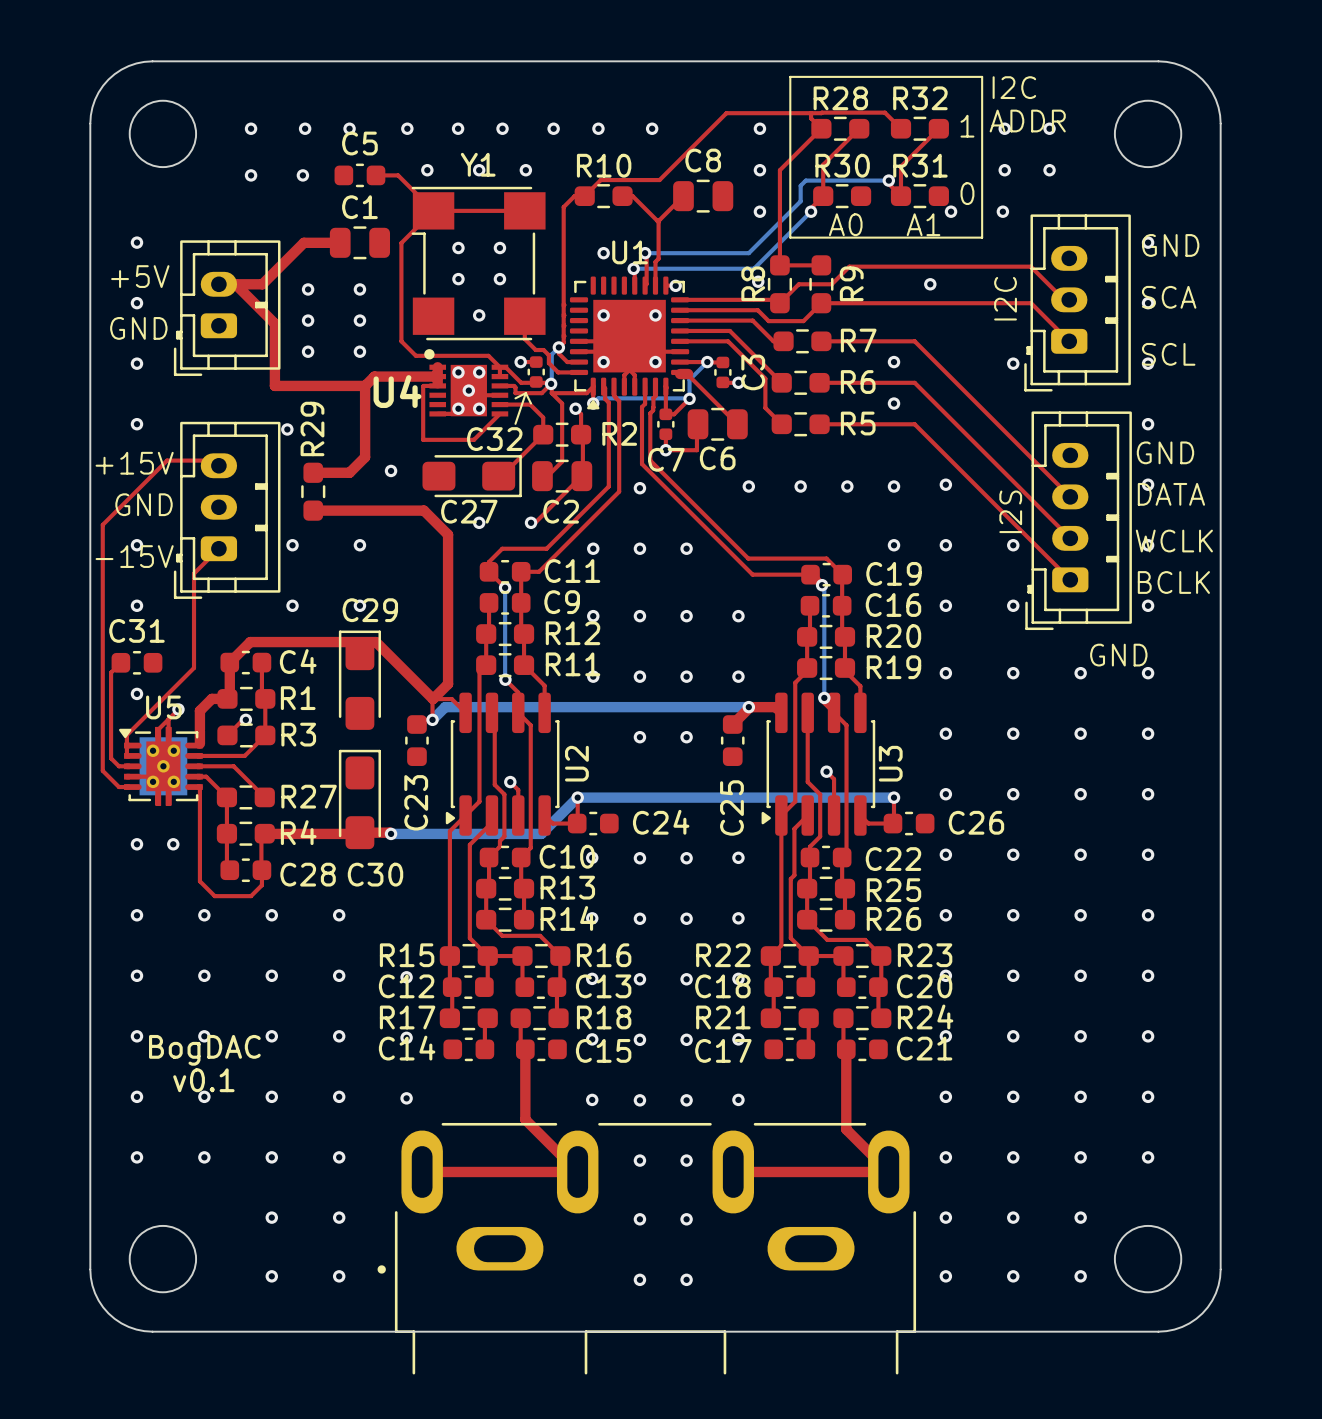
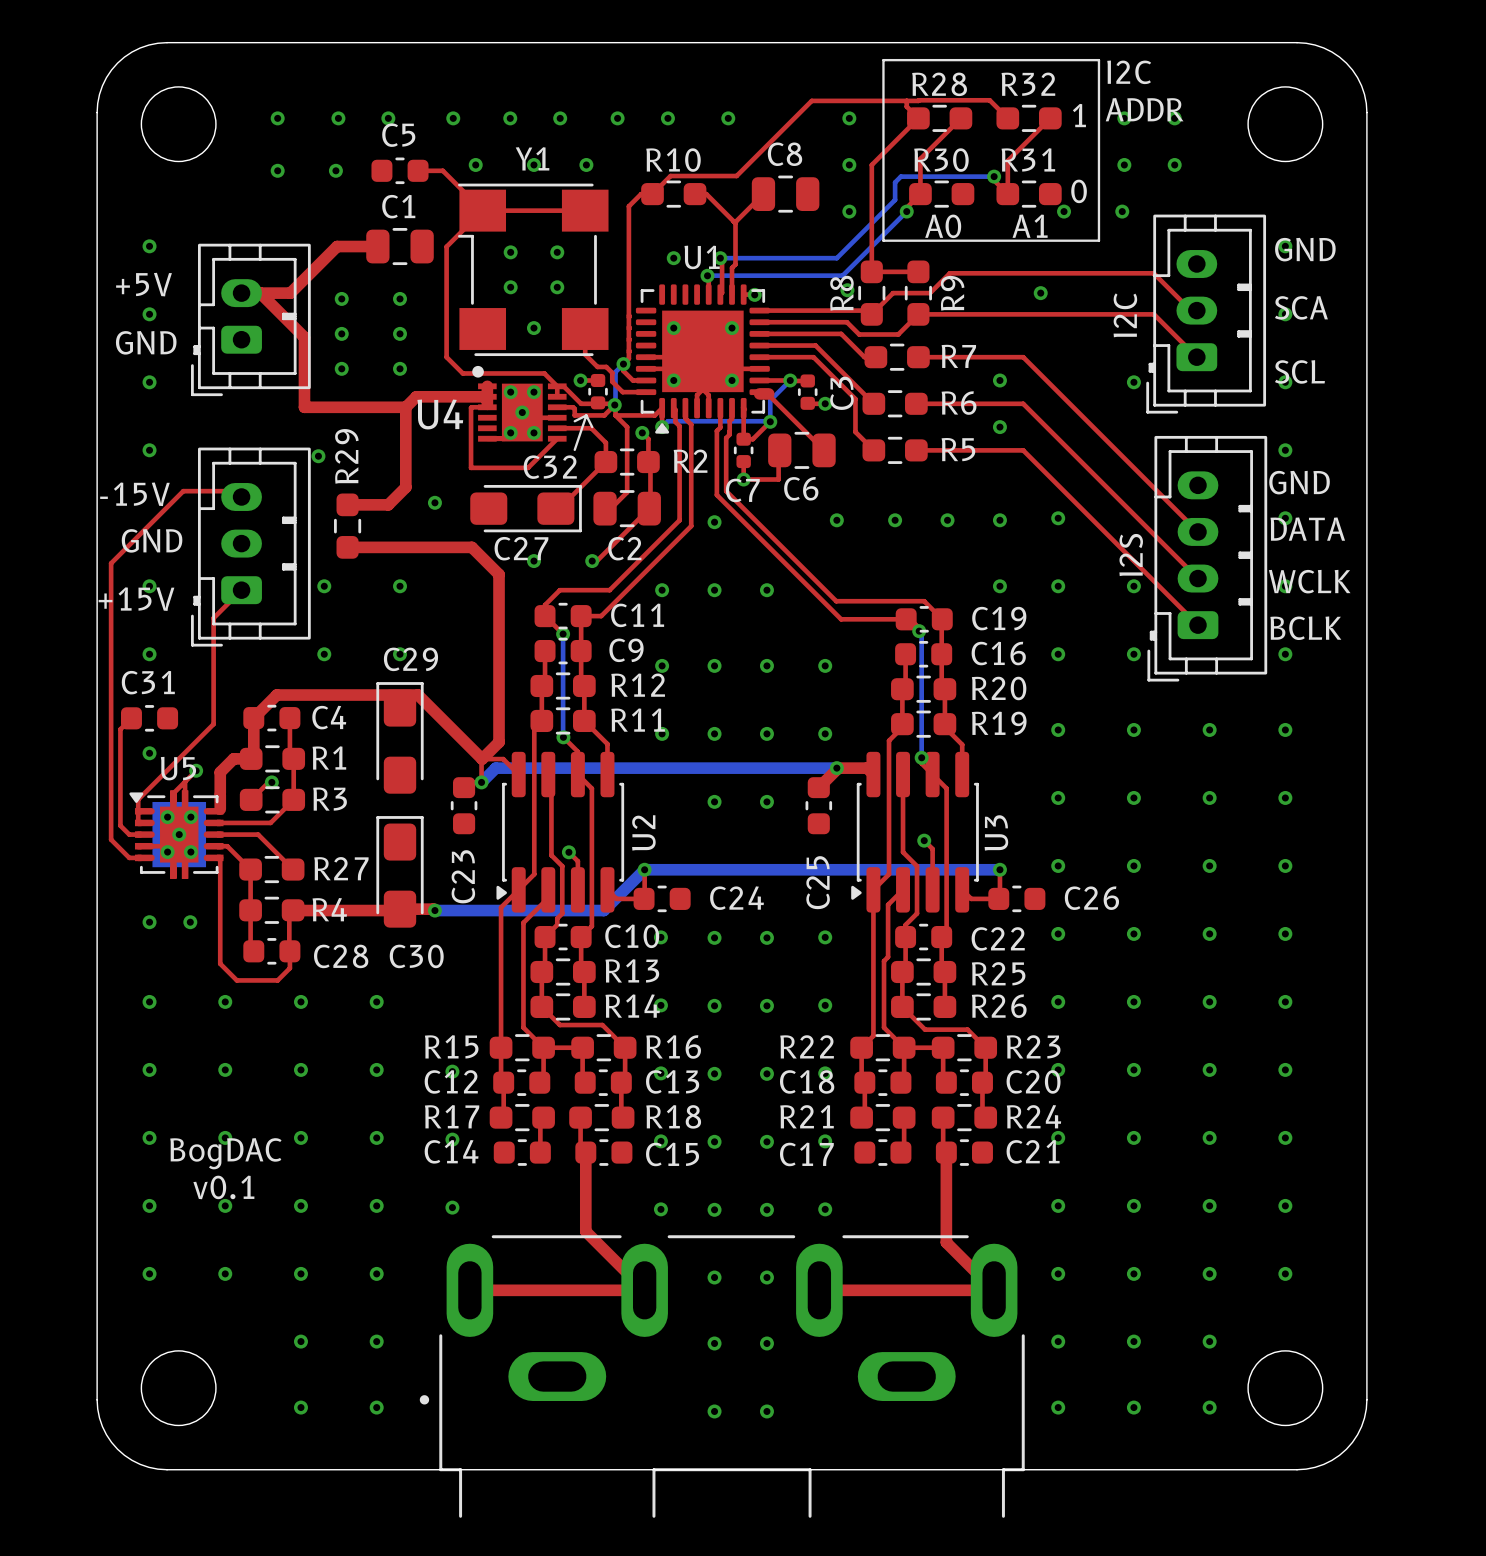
text: +15V (134, 463) -> -15V (134, 494)
text: -15V (134, 556) -> +15V (136, 599)
text: GND (1118, 655) -> none

